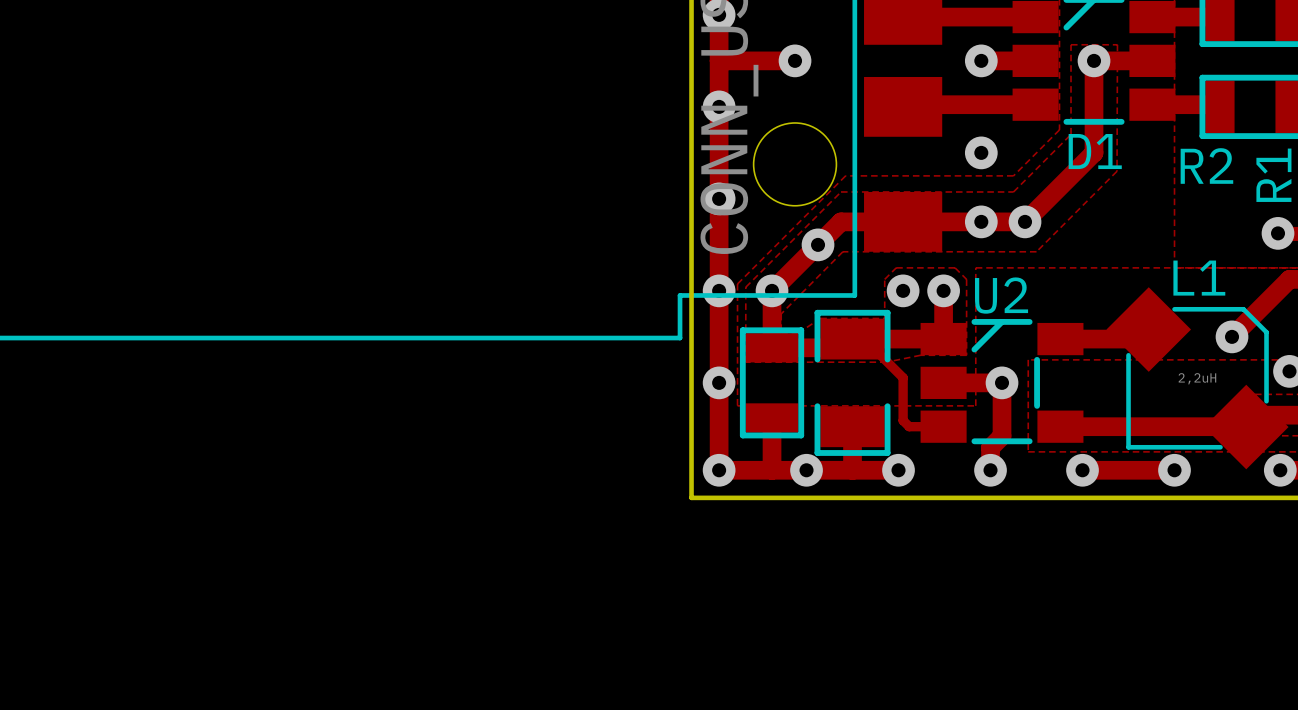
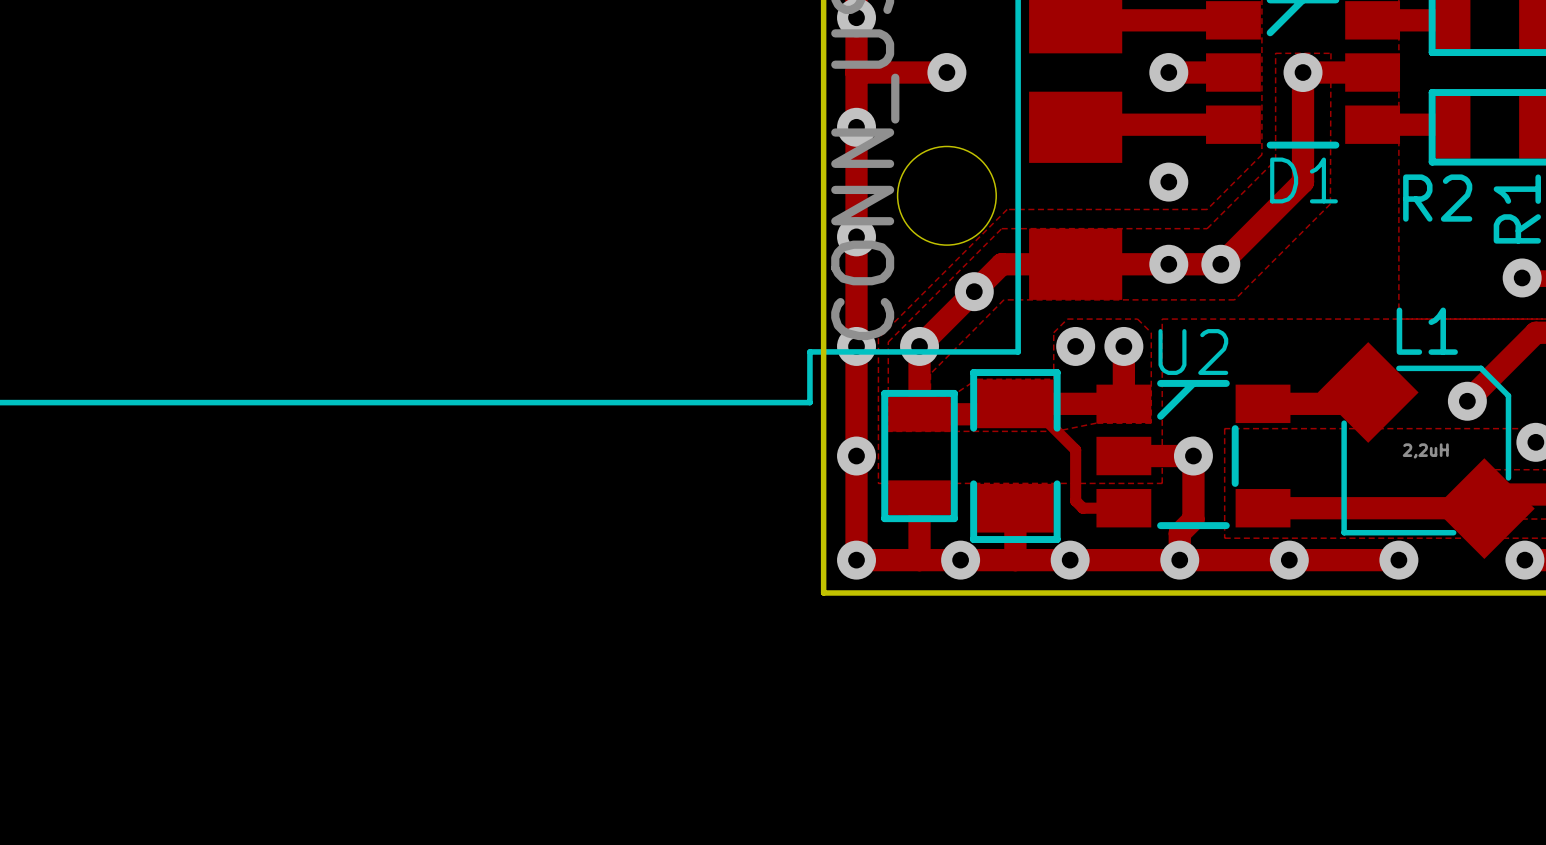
track: none -> (1070, 560) (1289, 560)

